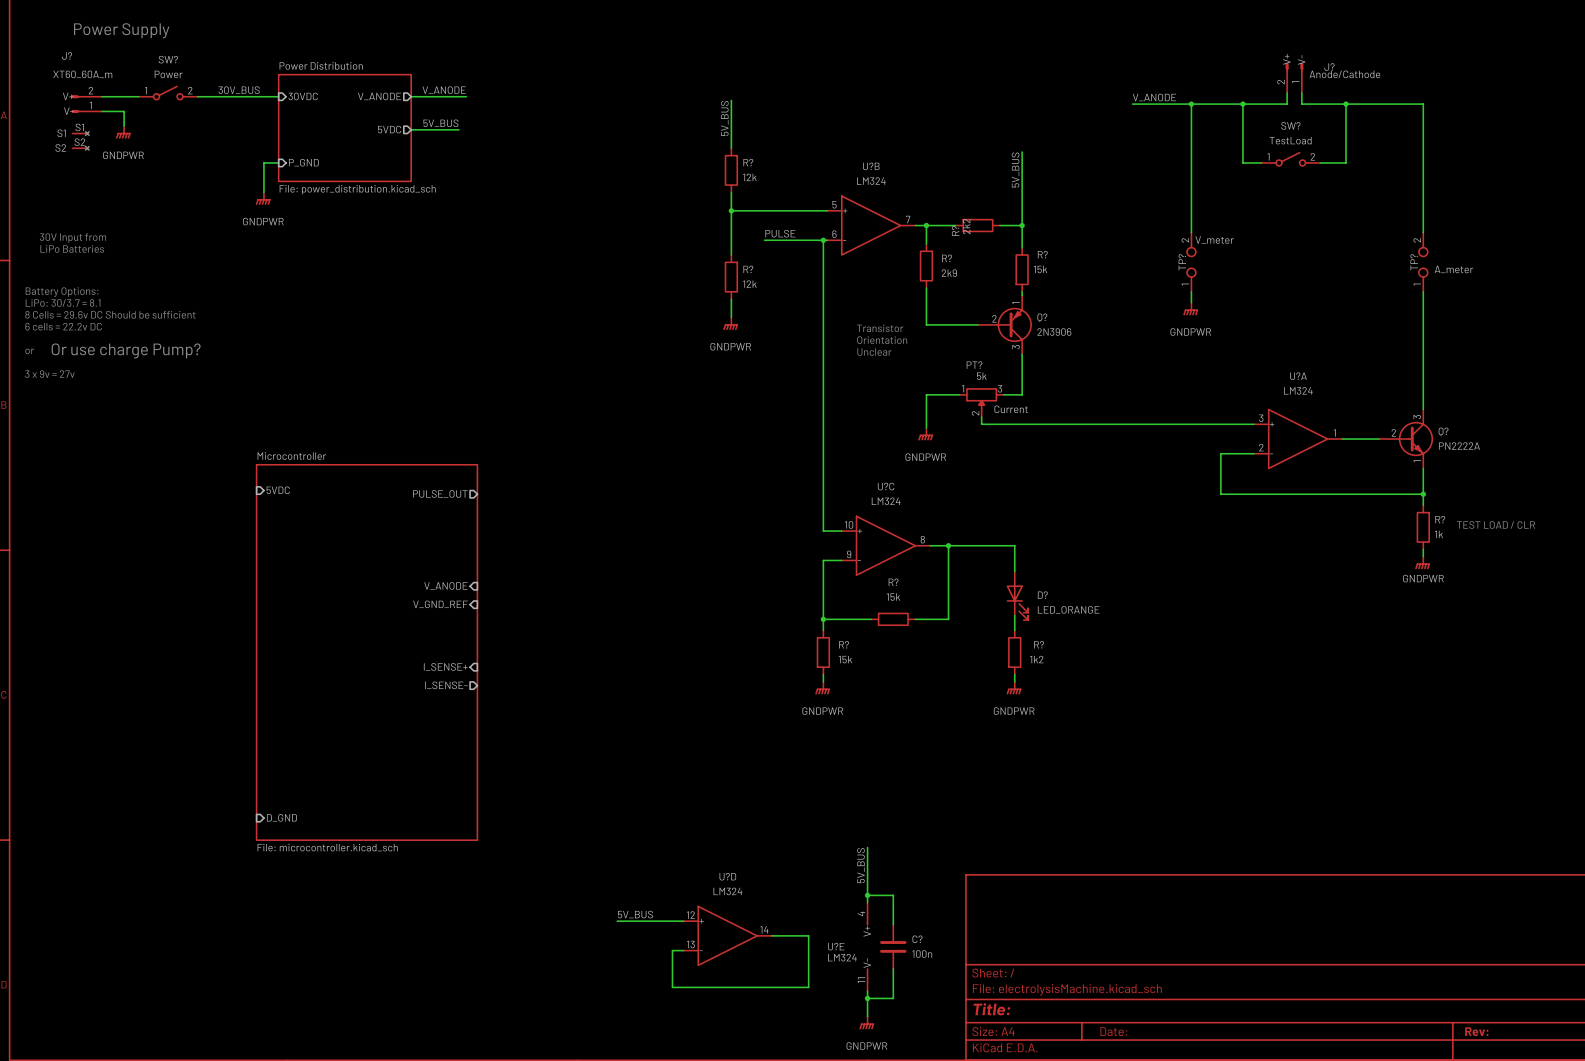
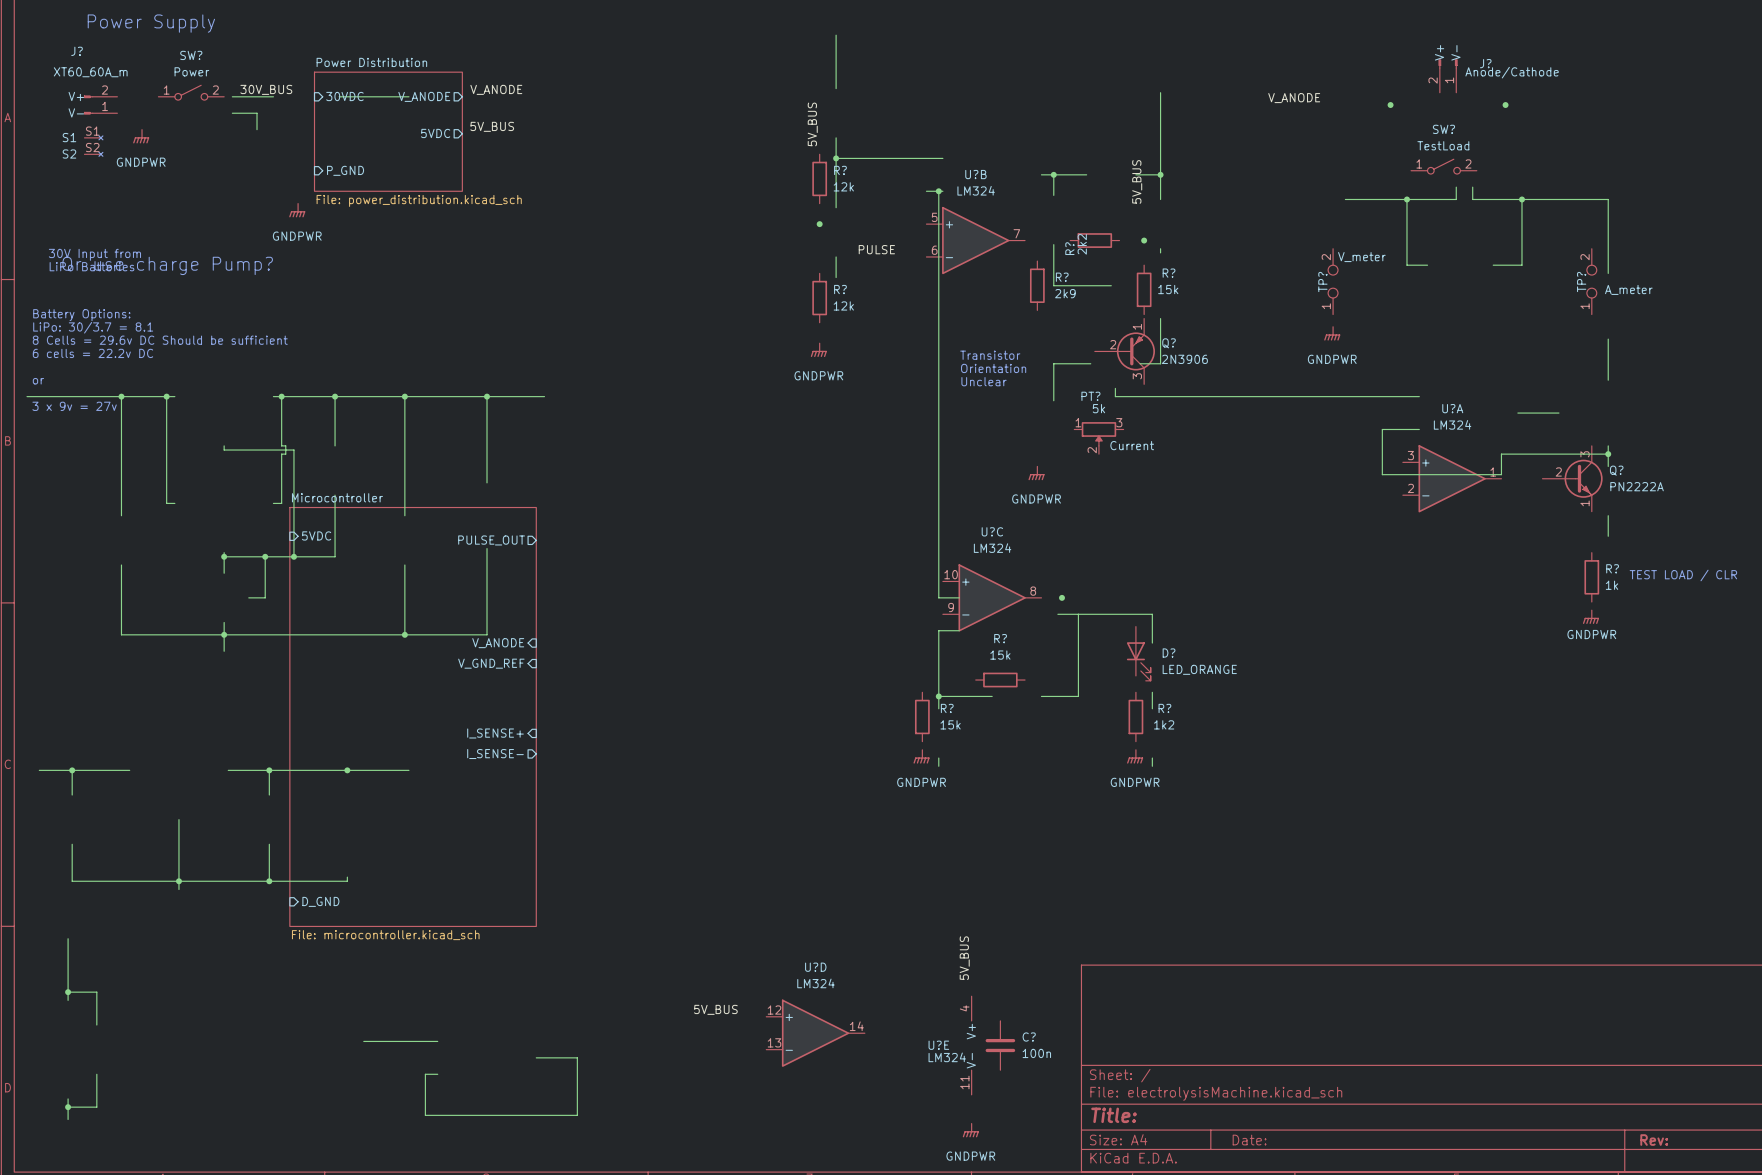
wire: (1287, 93) (1287, 104) (1132, 104) -> none
wire: (1301, 93) (1301, 104) (1423, 104) (1423, 232) -> none
wire: (102, 96) (138, 96) -> none
wire: (197, 96) (205, 96) -> none
wire: (241, 96) (278, 96) -> none
wire: none -> (339, 96) (408, 96)
wire: (411, 96) (466, 96) -> none
wire: (731, 100) (731, 148) -> (836, 35) (836, 88)
wire: (1191, 104) (1191, 232) -> none
junction: (1191, 104) -> none
wire: (1242, 104) (1242, 162) (1261, 162) -> (1406, 199) (1406, 265) (1427, 265)
wire: (1346, 104) (1346, 162) (1320, 162) -> (1521, 199) (1521, 265) (1493, 265)
wire: (102, 111) (124, 111) (124, 126) -> (232, 113) (257, 113) (257, 129)
wire: (411, 129) (459, 129) -> none
junction: none -> (836, 158)
wire: (1022, 151) (1022, 247) -> (1160, 92) (1160, 199)
wire: (278, 162) (263, 162) (263, 192) -> none
junction: none -> (1053, 174)
junction: none -> (1160, 174)
wire: none -> (1456, 187) (1456, 199) (1345, 199)
wire: none -> (1472, 187) (1472, 199) (1608, 199) (1608, 273)
wire: none -> (926, 191) (942, 191)
wire: none -> (938, 191) (938, 597) (959, 597)
junction: none -> (938, 191)
junction: none -> (1406, 199)
junction: none -> (1521, 199)
wire: (731, 192) (731, 254) -> (836, 137) (836, 207)
wire: (731, 210) (827, 210) -> (836, 158) (942, 158)
wire: (915, 225) (955, 225) -> (1041, 174) (1086, 174)
wire: (926, 225) (926, 243) -> (1053, 174) (1053, 195)
junction: (926, 225) -> none
wire: (1000, 225) (1022, 225) -> (1135, 174) (1160, 174)
wire: (764, 240) (827, 240) -> none
wire: (823, 240) (823, 531) (841, 531) -> none
junction: (823, 240) -> none
wire: (926, 288) (926, 324) (977, 324) -> (1053, 244) (1053, 285) (1111, 285)
wire: (1022, 291) (1022, 295) -> (1160, 248) (1160, 252)
wire: (1191, 291) (1191, 302) -> none
wire: (1423, 291) (1423, 409) -> none
wire: (731, 299) (731, 317) -> (836, 256) (836, 277)
wire: none -> (1608, 339) (1608, 380)
text position: Or use charge Pump? (126, 350) -> Or use charge Pump? (167, 265)
wire: (1022, 354) (1022, 394) (1003, 394) -> (1160, 318) (1160, 363) (1140, 363)
wire: none -> (27, 396) (174, 396)
wire: none -> (121, 396) (121, 515)
junction: none -> (121, 396)
wire: none -> (166, 396) (166, 503) (174, 503)
junction: none -> (166, 396)
wire: none -> (273, 396) (544, 396)
wire: none -> (281, 396) (281, 445) (285, 445) (285, 454) (281, 454) (281, 503) (273, 503)
junction: none -> (281, 396)
wire: none -> (335, 396) (335, 445)
junction: none -> (335, 396)
wire: none -> (404, 396) (404, 515)
junction: none -> (404, 396)
wire: none -> (487, 396) (487, 482)
junction: none -> (487, 396)
wire: (959, 394) (926, 394) (926, 427) -> (1090, 363) (1053, 363) (1053, 400)
wire: none -> (1419, 429) (1382, 429) (1382, 474) (1501, 474) (1501, 454) (1608, 454)
wire: none -> (224, 445) (224, 450) (293, 450) (293, 556)
wire: none -> (1608, 445) (1608, 466)
wire: (981, 416) (981, 424) (1254, 424) -> (1115, 388) (1115, 396) (1419, 396)
junction: none -> (1608, 454)
wire: (1342, 439) (1379, 439) -> (1517, 413) (1558, 413)
wire: none -> (335, 495) (335, 556) (224, 556)
wire: (1254, 453) (1220, 453) (1220, 494) (1423, 494) -> none
wire: (1423, 468) (1423, 505) -> none
wire: none -> (1608, 515) (1608, 536)
junction: (1423, 494) -> none
wire: none -> (487, 548) (487, 634) (121, 634) (121, 565)
wire: none -> (224, 552) (224, 573)
junction: none -> (224, 556)
wire: none -> (265, 556) (265, 597) (248, 597)
junction: none -> (265, 556)
junction: none -> (293, 556)
wire: none -> (404, 565) (404, 634)
wire: (930, 545) (1014, 545) (1014, 571) -> (1057, 614) (1152, 614) (1152, 643)
wire: (948, 545) (948, 619) (915, 619) -> (1078, 614) (1078, 696) (1041, 696)
wire: (1423, 549) (1423, 556) -> none
wire: (841, 560) (823, 560) (823, 630) -> (959, 630) (938, 630) (938, 708)
wire: none -> (224, 622) (224, 651)
junction: none -> (224, 634)
junction: none -> (404, 634)
wire: (1014, 615) (1014, 630) -> (1152, 692) (1152, 708)
wire: (823, 619) (871, 619) -> (938, 696) (992, 696)
junction position: (823, 619) -> (938, 696)
wire: (823, 674) (823, 681) -> (938, 758) (938, 766)
wire: (1014, 674) (1014, 681) -> (1152, 758) (1152, 766)
wire: none -> (39, 770) (129, 770)
wire: none -> (72, 770) (72, 795)
junction: none -> (72, 770)
wire: none -> (228, 770) (408, 770)
wire: none -> (269, 770) (269, 795)
junction: none -> (269, 770)
junction: none -> (347, 770)
wire: none -> (178, 819) (178, 889)
wire: none -> (72, 844) (72, 881) (347, 881) (347, 877)
wire: none -> (269, 844) (269, 881)
junction: none -> (178, 881)
junction: none -> (269, 881)
wire: (867, 847) (867, 902) -> none
wire: none -> (68, 938) (68, 1000)
wire: (867, 895) (893, 895) (893, 924) -> none
junction: (867, 895) -> none
wire: none -> (68, 992) (96, 992) (96, 1025)
junction: none -> (68, 992)
wire: (617, 921) (683, 921) -> none
wire: (771, 935) (808, 935) (808, 987) (672, 987) (672, 950) (683, 950) -> none
wire: none -> (363, 1041) (437, 1041)
wire: none -> (536, 1057) (577, 1057) (577, 1115) (425, 1115) (425, 1074) (437, 1074)
wire: (893, 969) (893, 998) (867, 998) -> none
wire: none -> (96, 1074) (96, 1107) (68, 1107)
wire: (867, 991) (867, 1016) -> none
wire: none -> (68, 1098) (68, 1119)
junction: (867, 998) -> none
junction: none -> (68, 1107)

